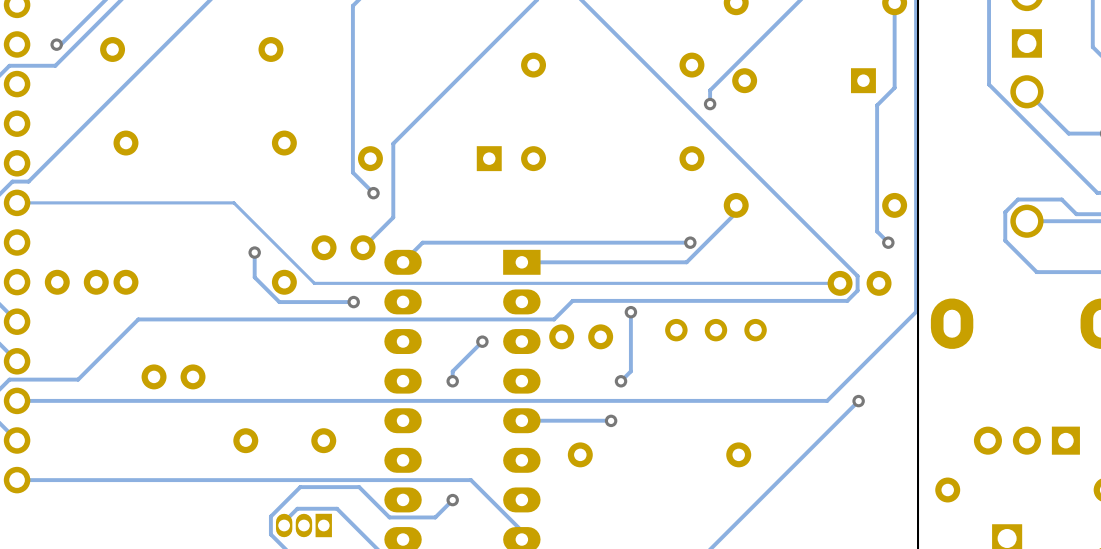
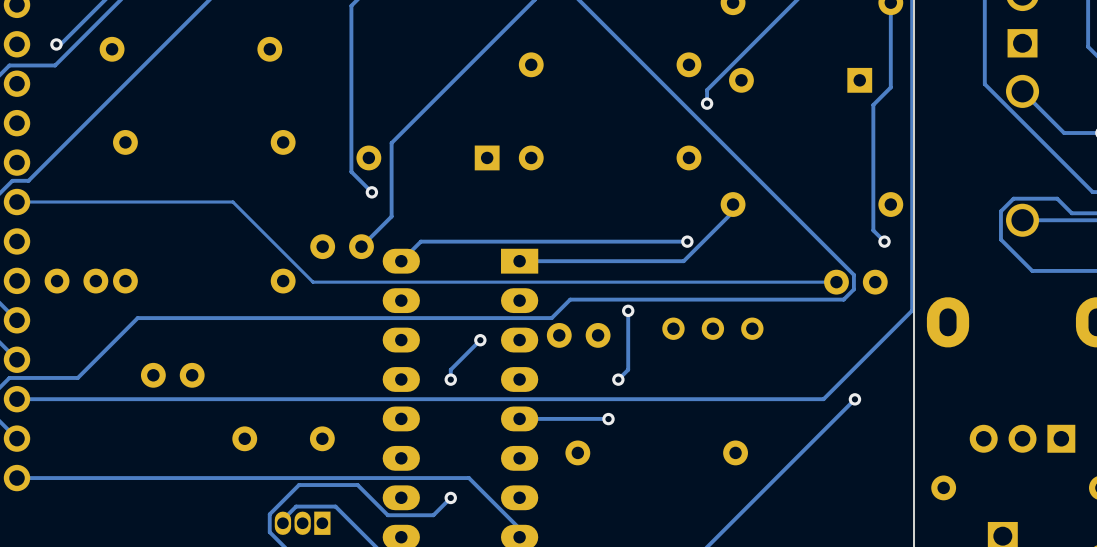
track: (254, 252) (254, 277) (279, 302) (353, 302) -> none
via: (254, 252) -> none
via: (353, 302) -> none

